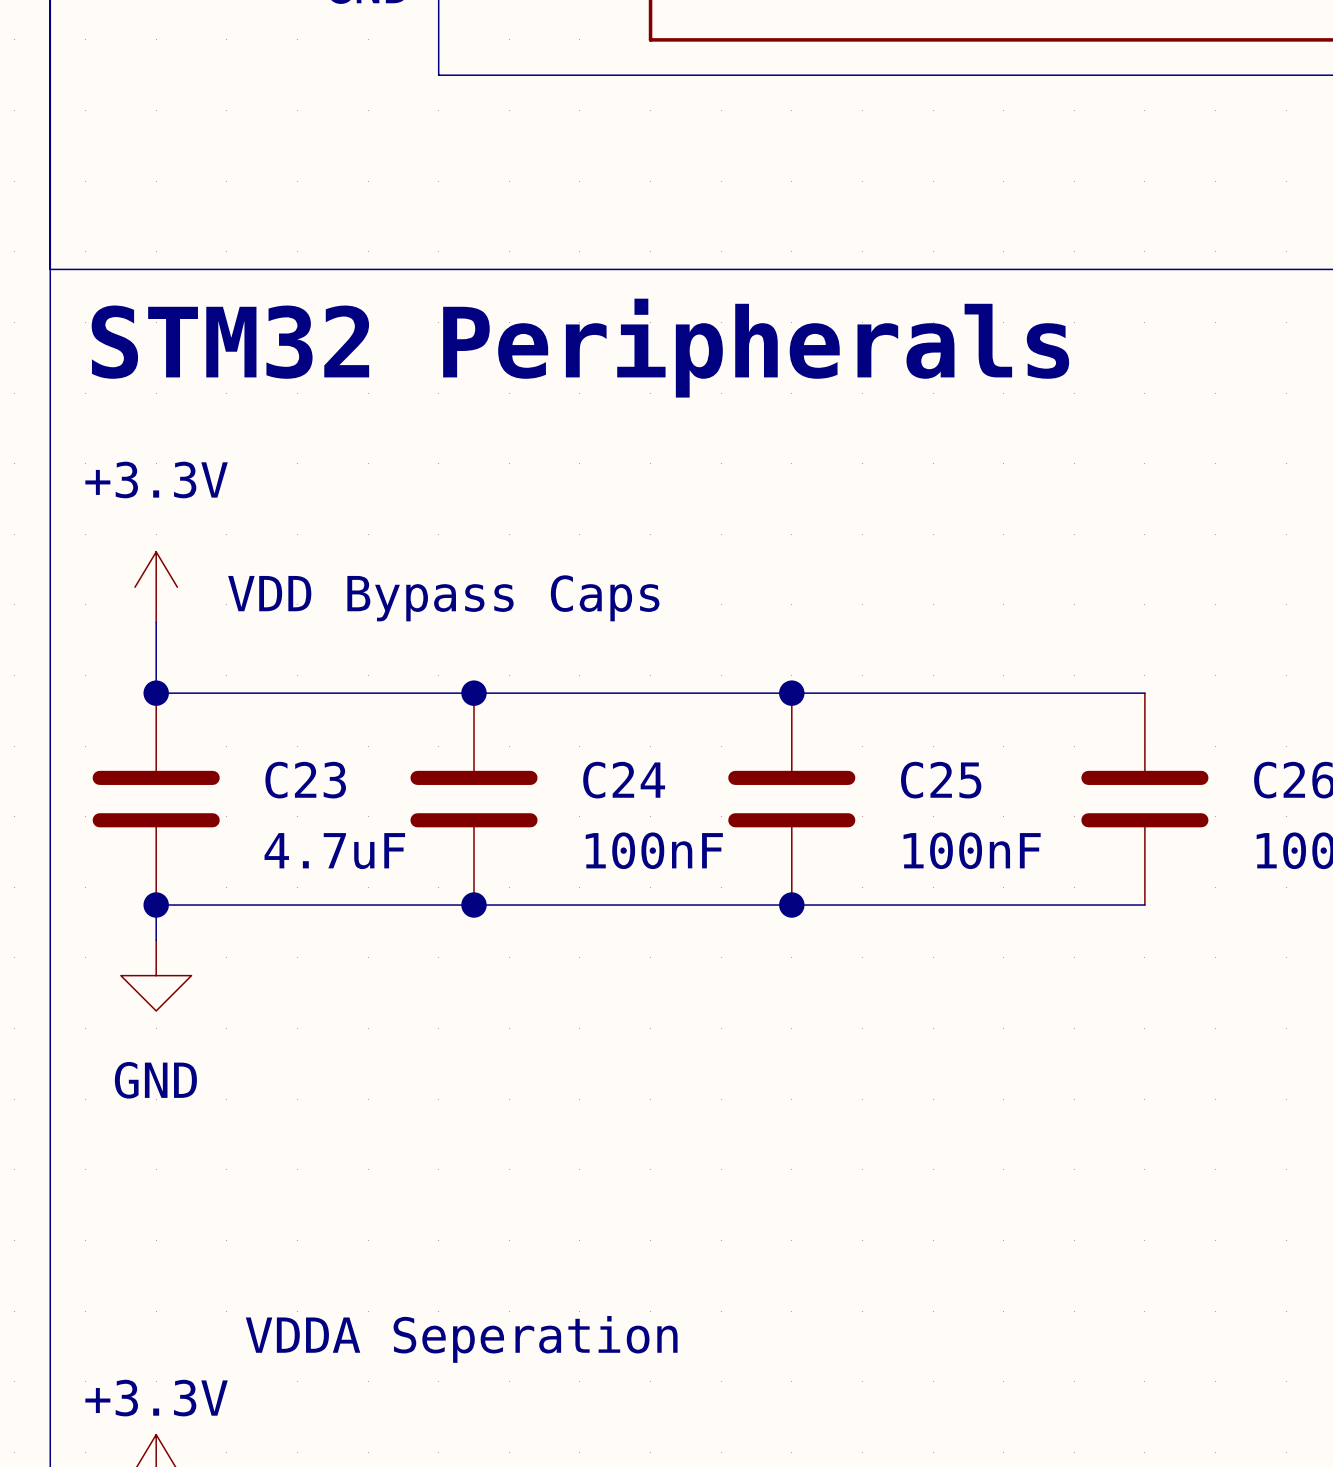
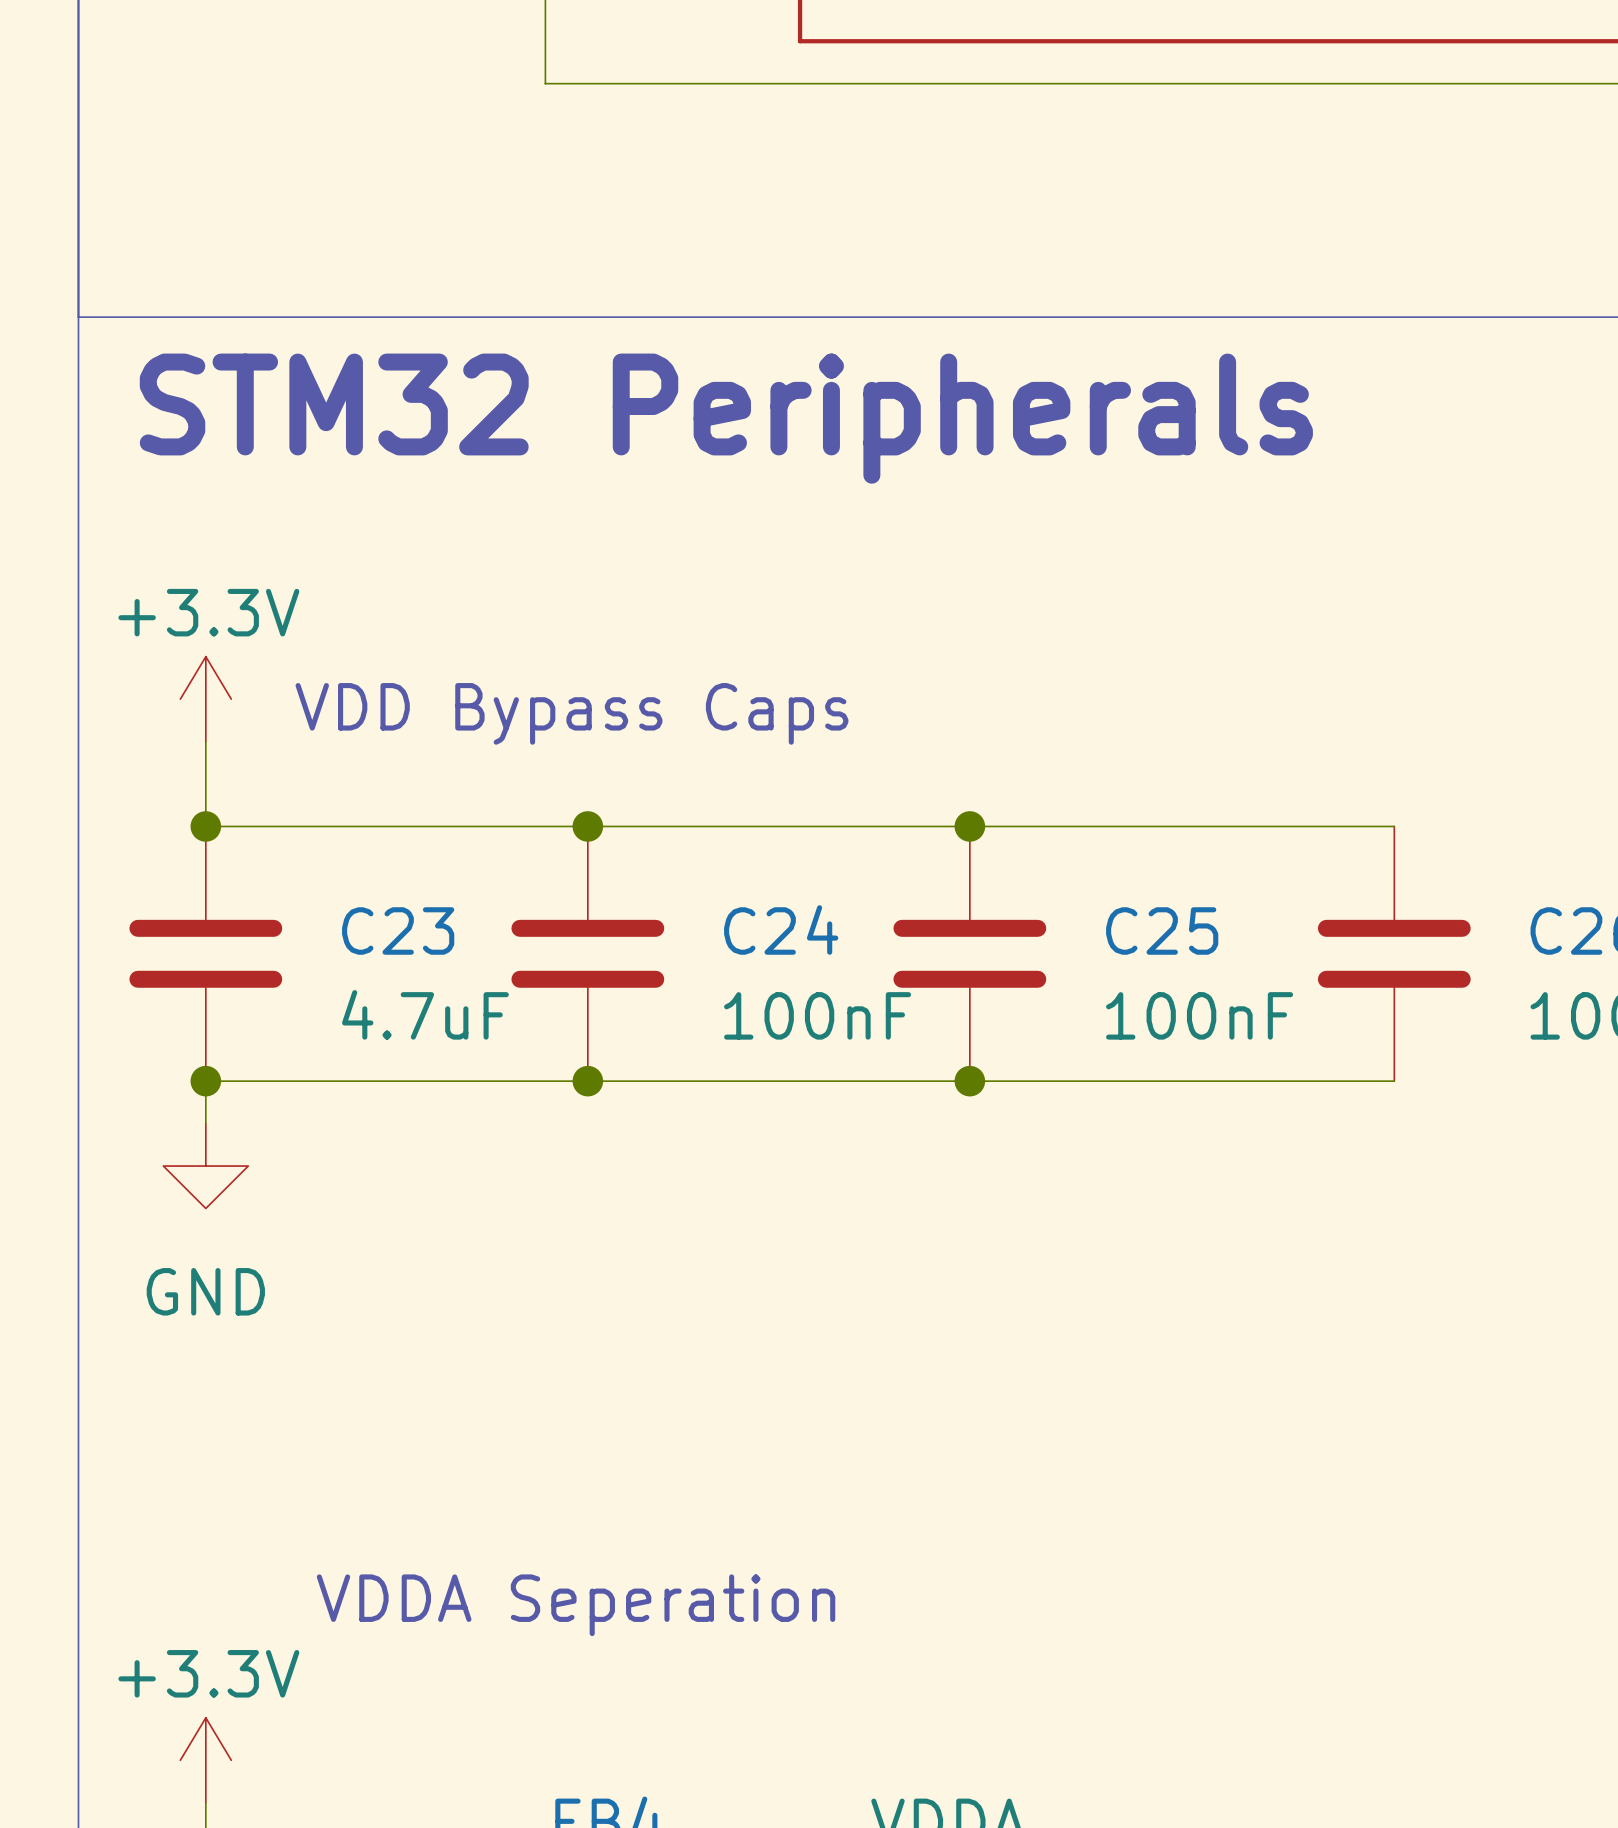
power symbol text position: +3.3V (156, 479) -> +3.3V (208, 612)

